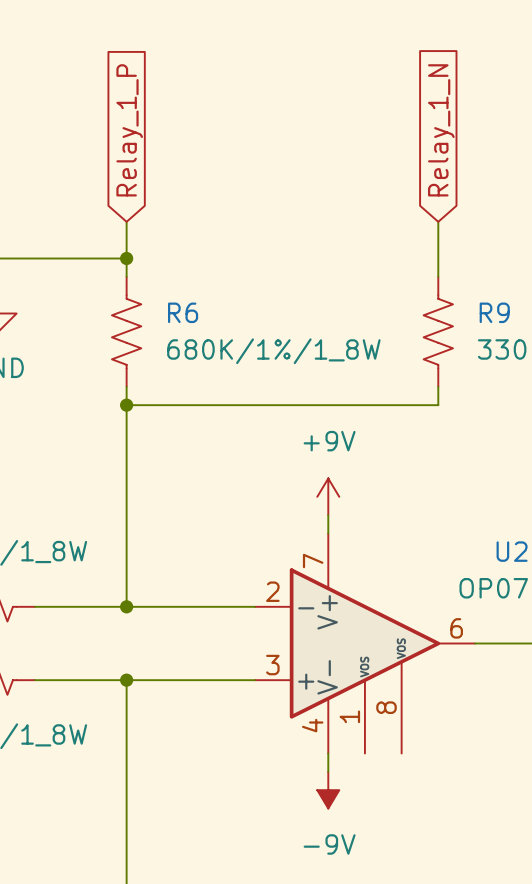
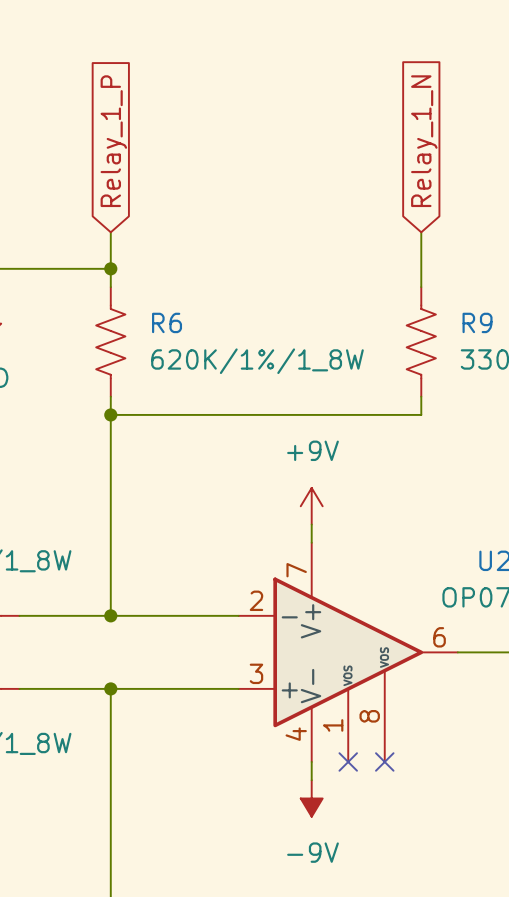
R6 value: 680K/1%/1_8W (273, 351) -> 620K/1%/1_8W (257, 361)
no-connect mark: none -> (348, 761)
no-connect mark: none -> (384, 761)

